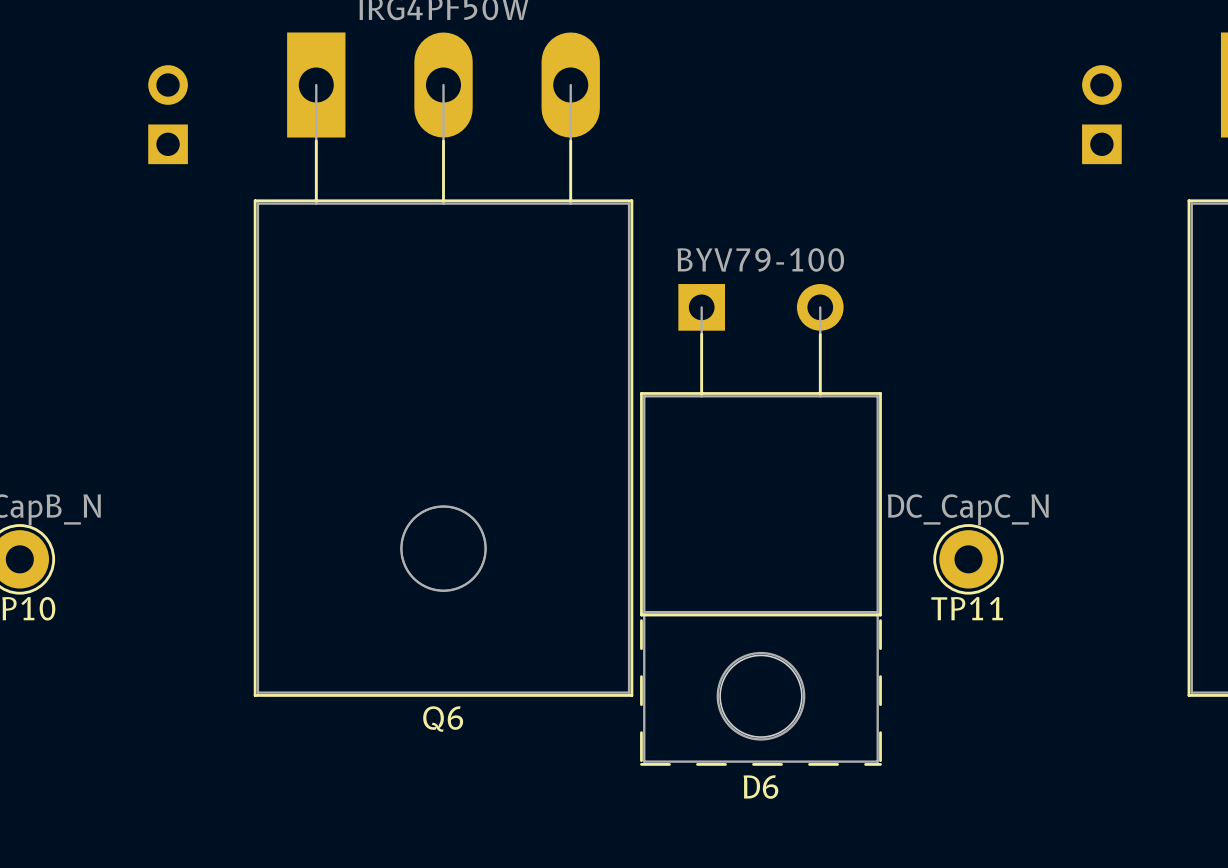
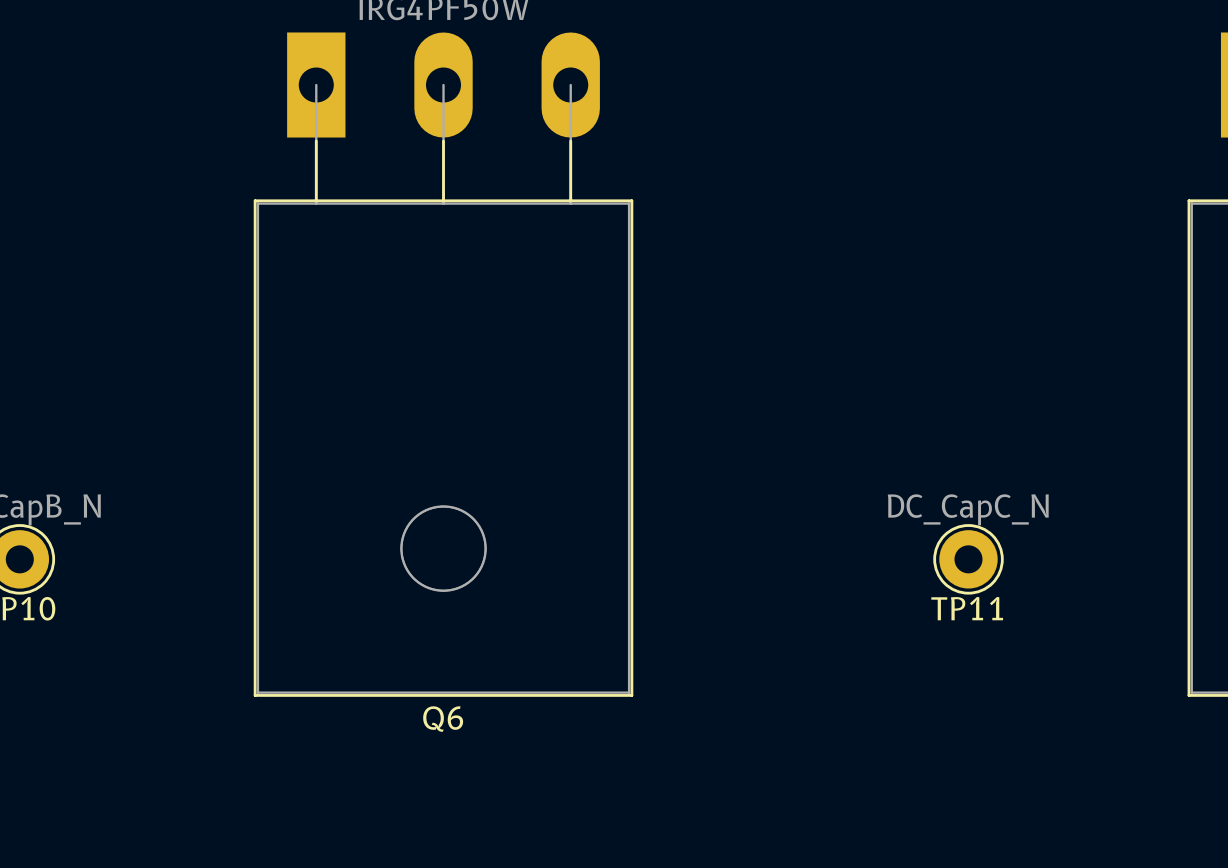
part: (168, 114) -> none
part: (1101, 114) -> none
D6: BYV79-100 (760, 524) -> none

